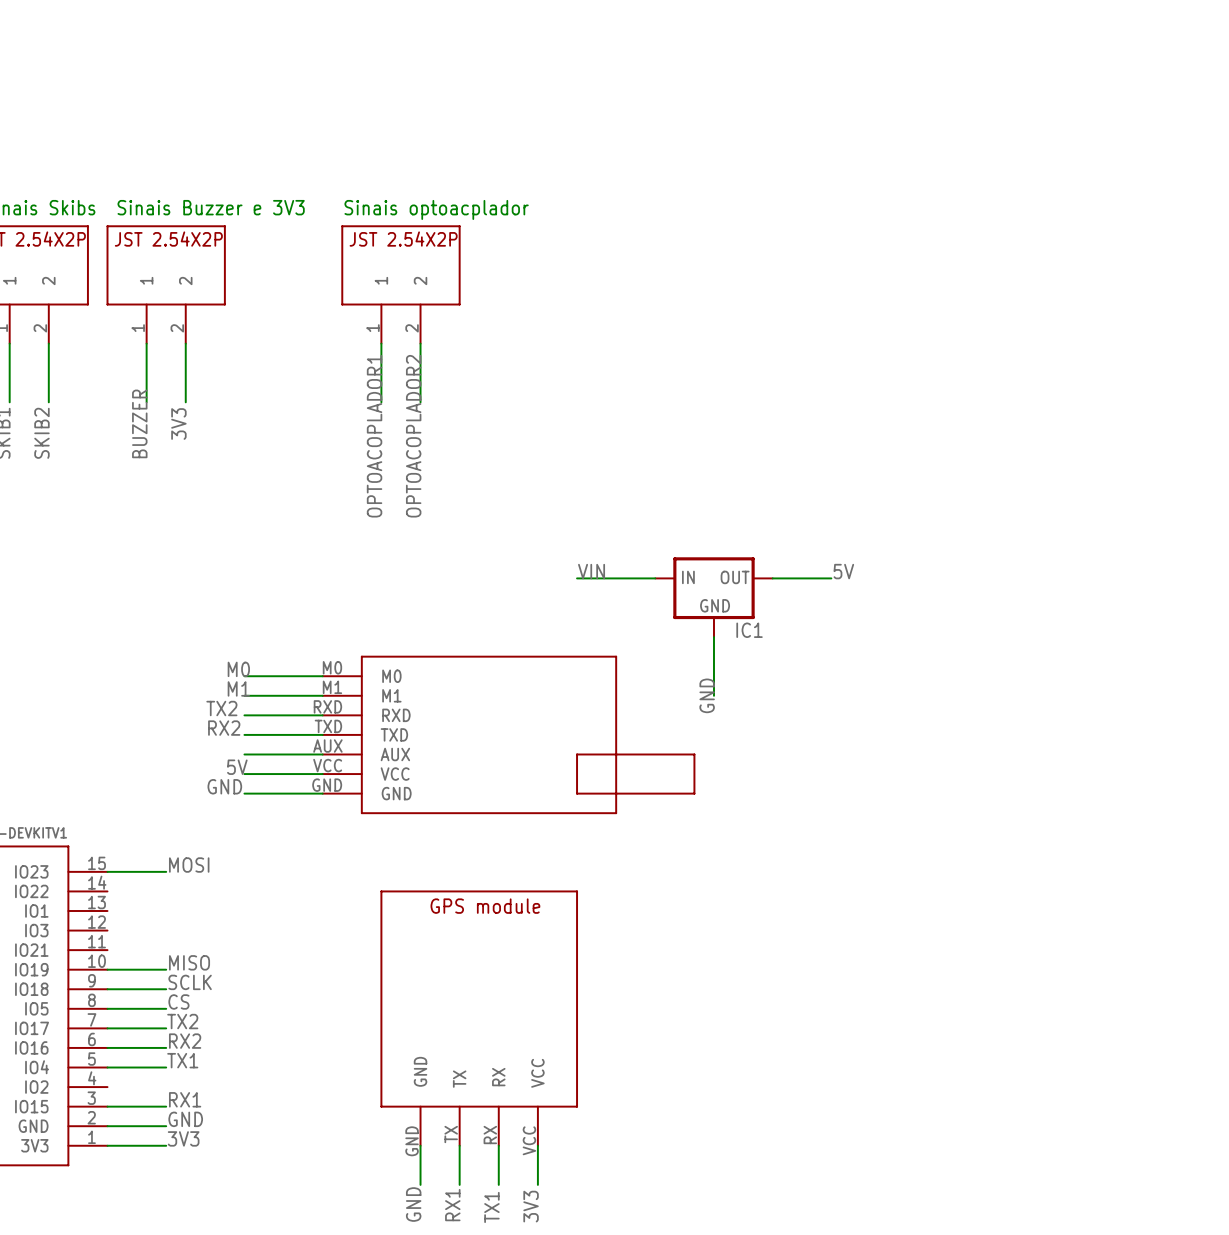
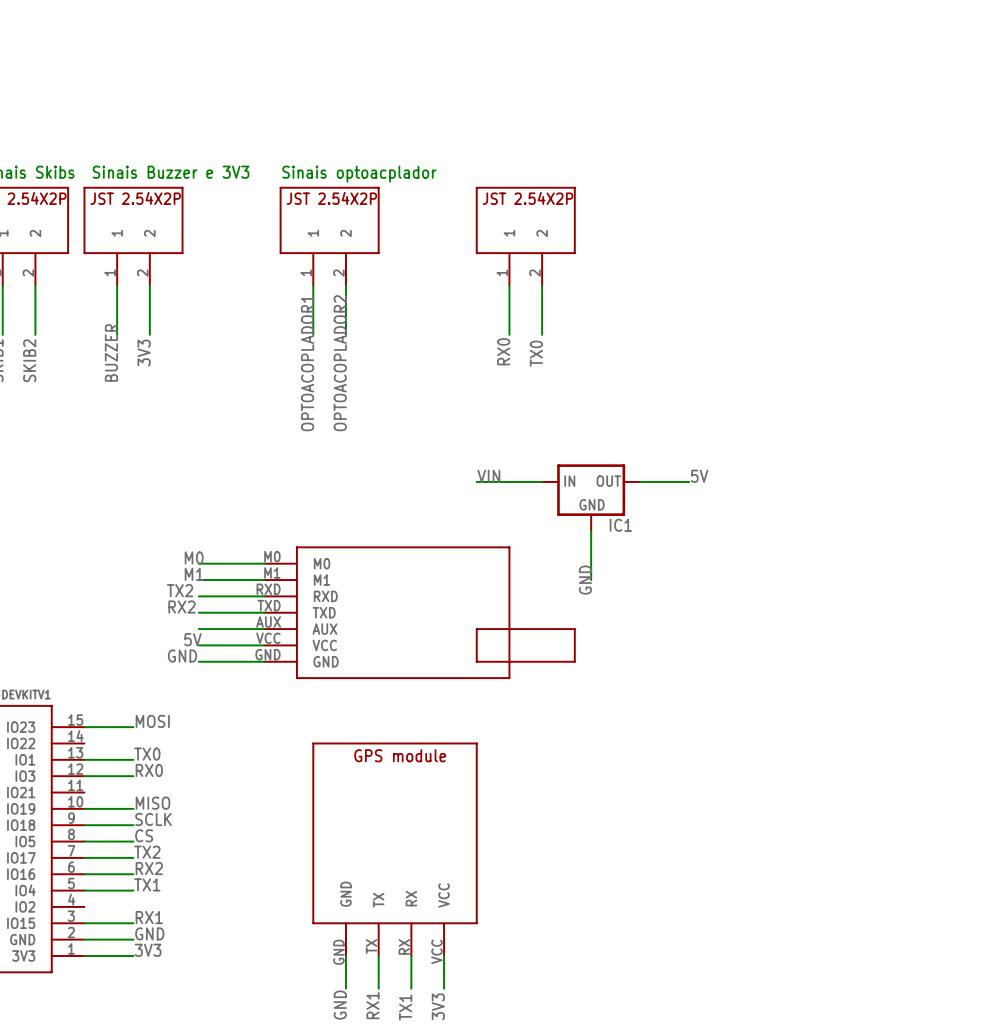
part: none -> (525, 236)
wire: none -> (509, 285) (509, 334)
wire: none -> (542, 285) (542, 334)
label: none -> RX0 (503, 351)
label: none -> TX0 (536, 353)
label: none -> TX0 (147, 754)
wire: none -> (84, 759) (133, 759)
label: none -> RX0 (149, 770)
wire: none -> (84, 776) (133, 776)

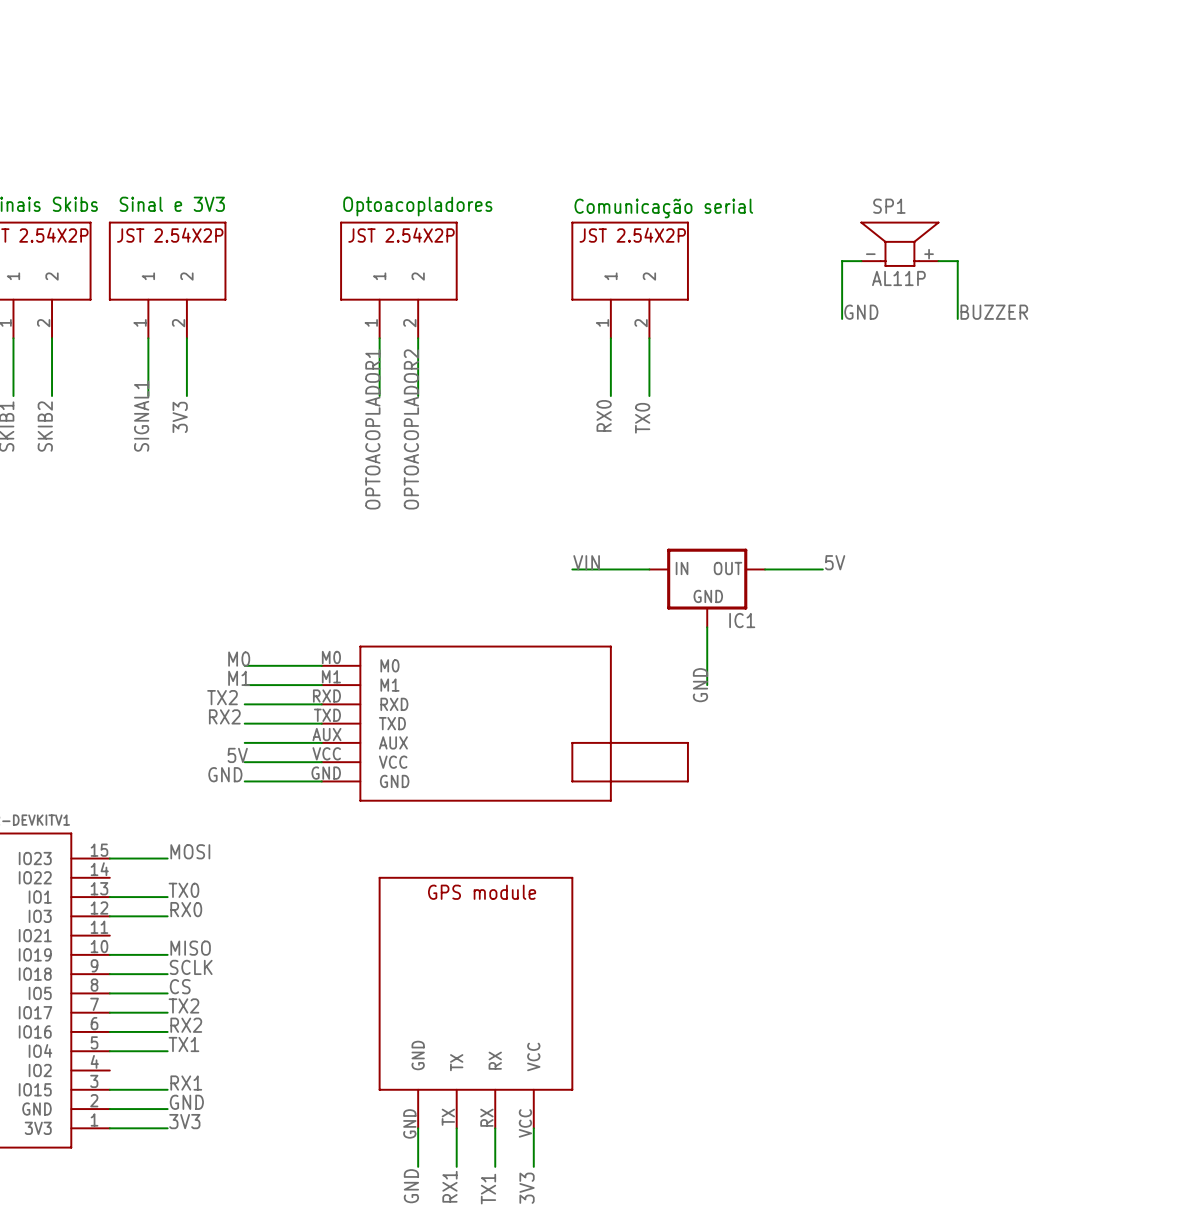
text: Sinais Buzzer e 3V3 (171, 172) -> Sinal e 3V3 (172, 204)
text: Sinais optoacplador (359, 174) -> Optoacopladores (417, 206)
text: none -> Comunicação serial (663, 208)
SP1: none -> AL11P (899, 244)
wire: none -> (861, 261) (842, 261) (842, 318)
wire: none -> (938, 261) (957, 261) (957, 318)
label: none -> GND (861, 312)
label: none -> BUZZER (994, 312)
label: BUZZER (111, 352) -> SIGNAL1 (141, 416)

